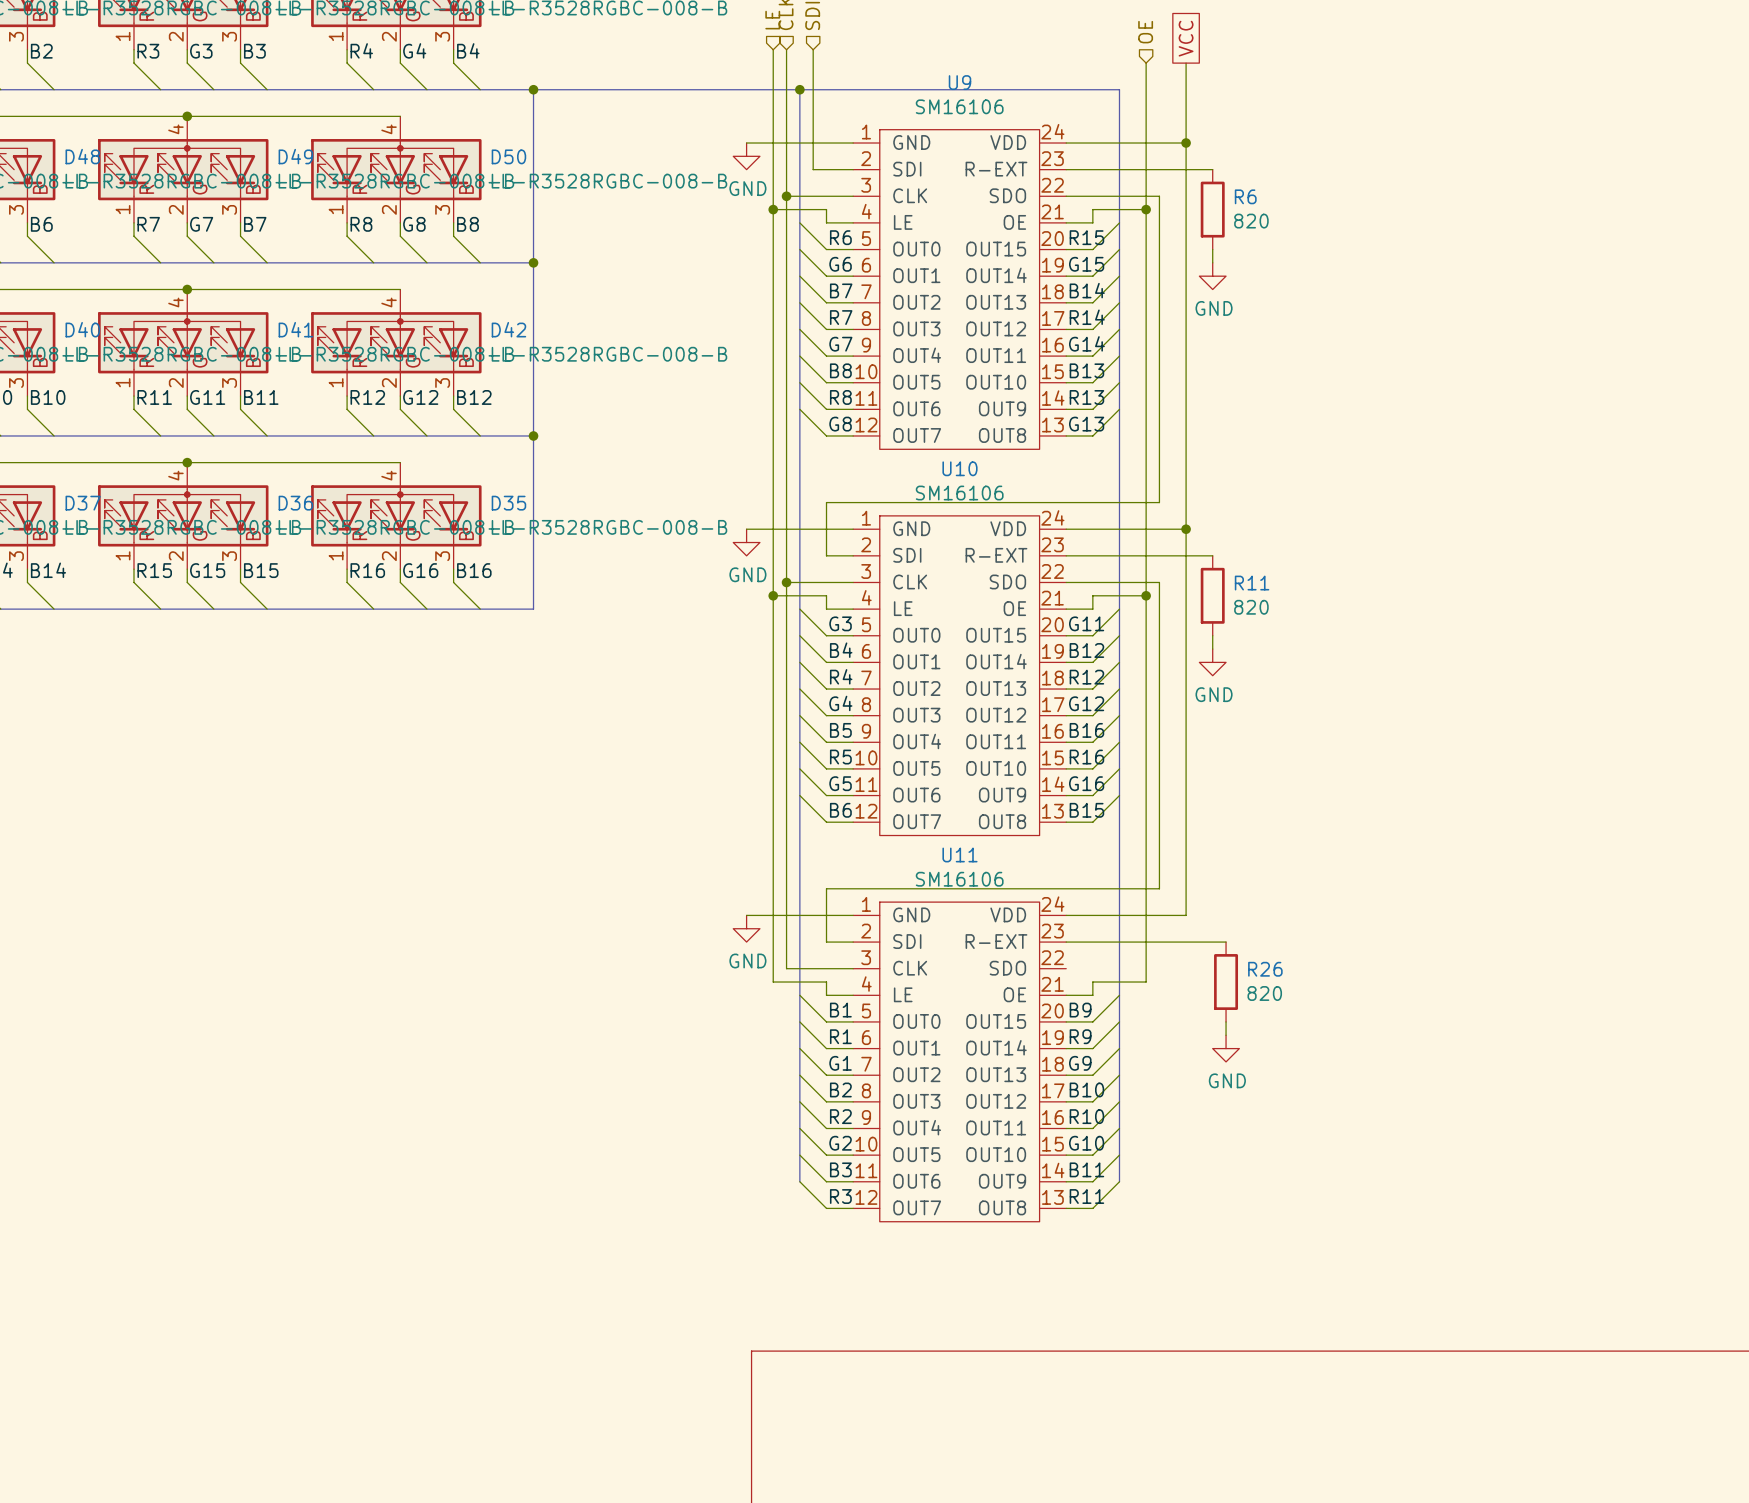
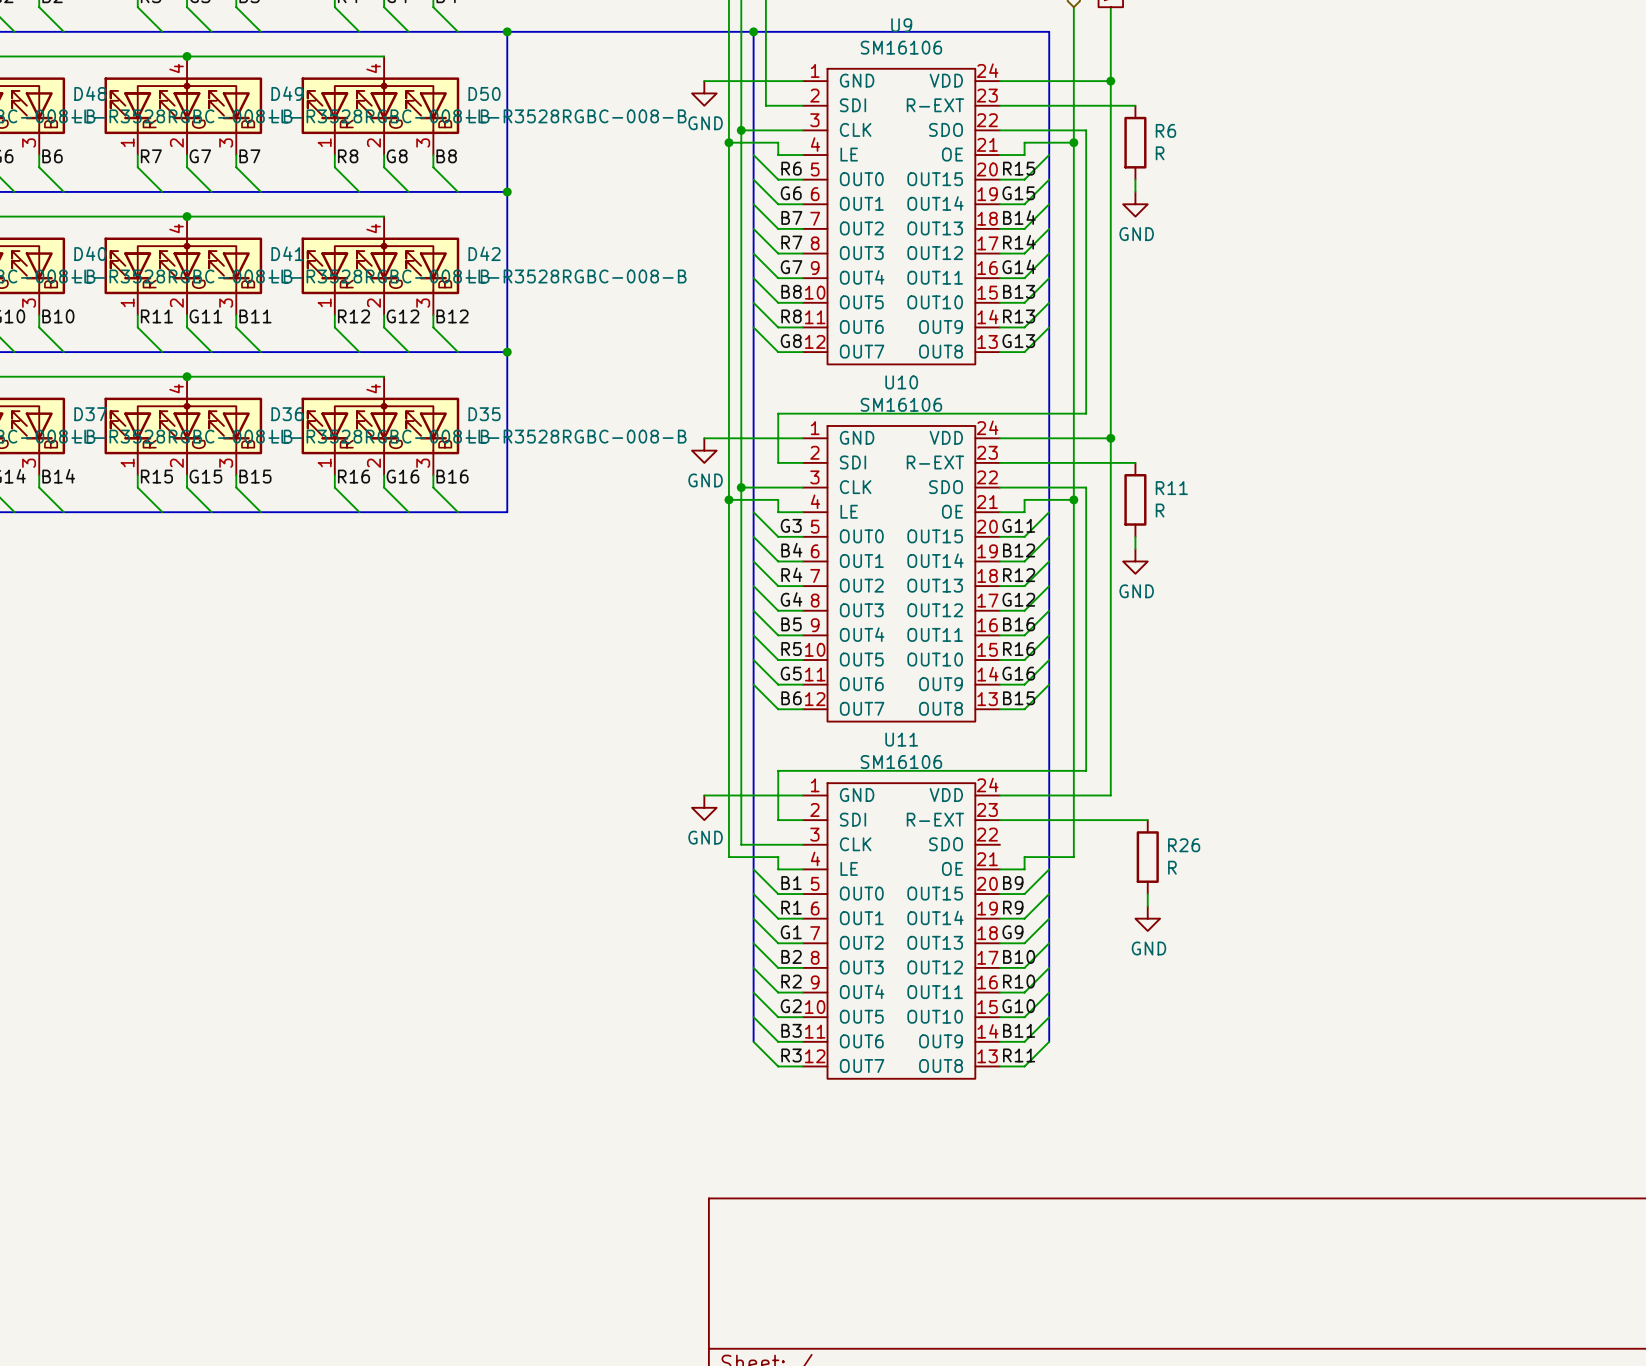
R6 value: 820 (1251, 221) -> R (1160, 153)
R11 value: 820 (1251, 607) -> R (1160, 510)
R26 value: 820 (1264, 993) -> R (1172, 867)

